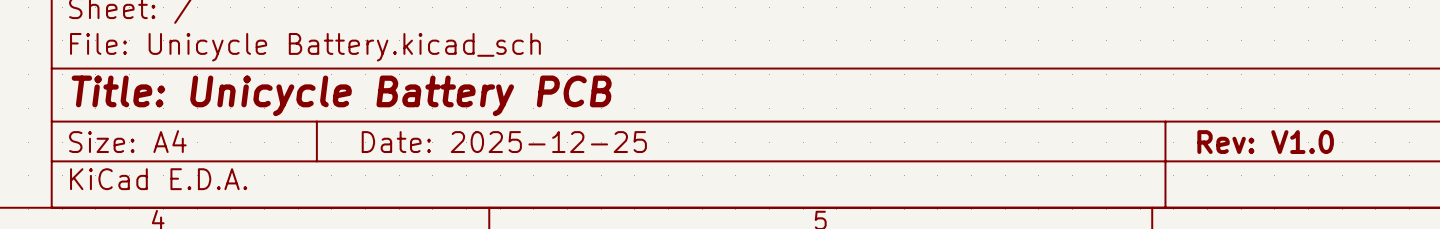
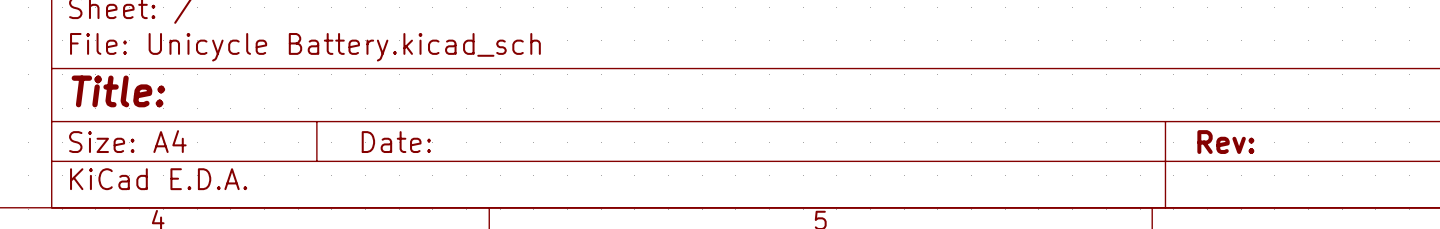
title block: Title: Unicycle Battery PCB (341, 95) -> Title: (118, 91)
title block: Date: 2025-12-25 (504, 142) -> Date: (396, 142)
title block: Rev: V1.0 (1265, 142) -> Rev: (1225, 142)

